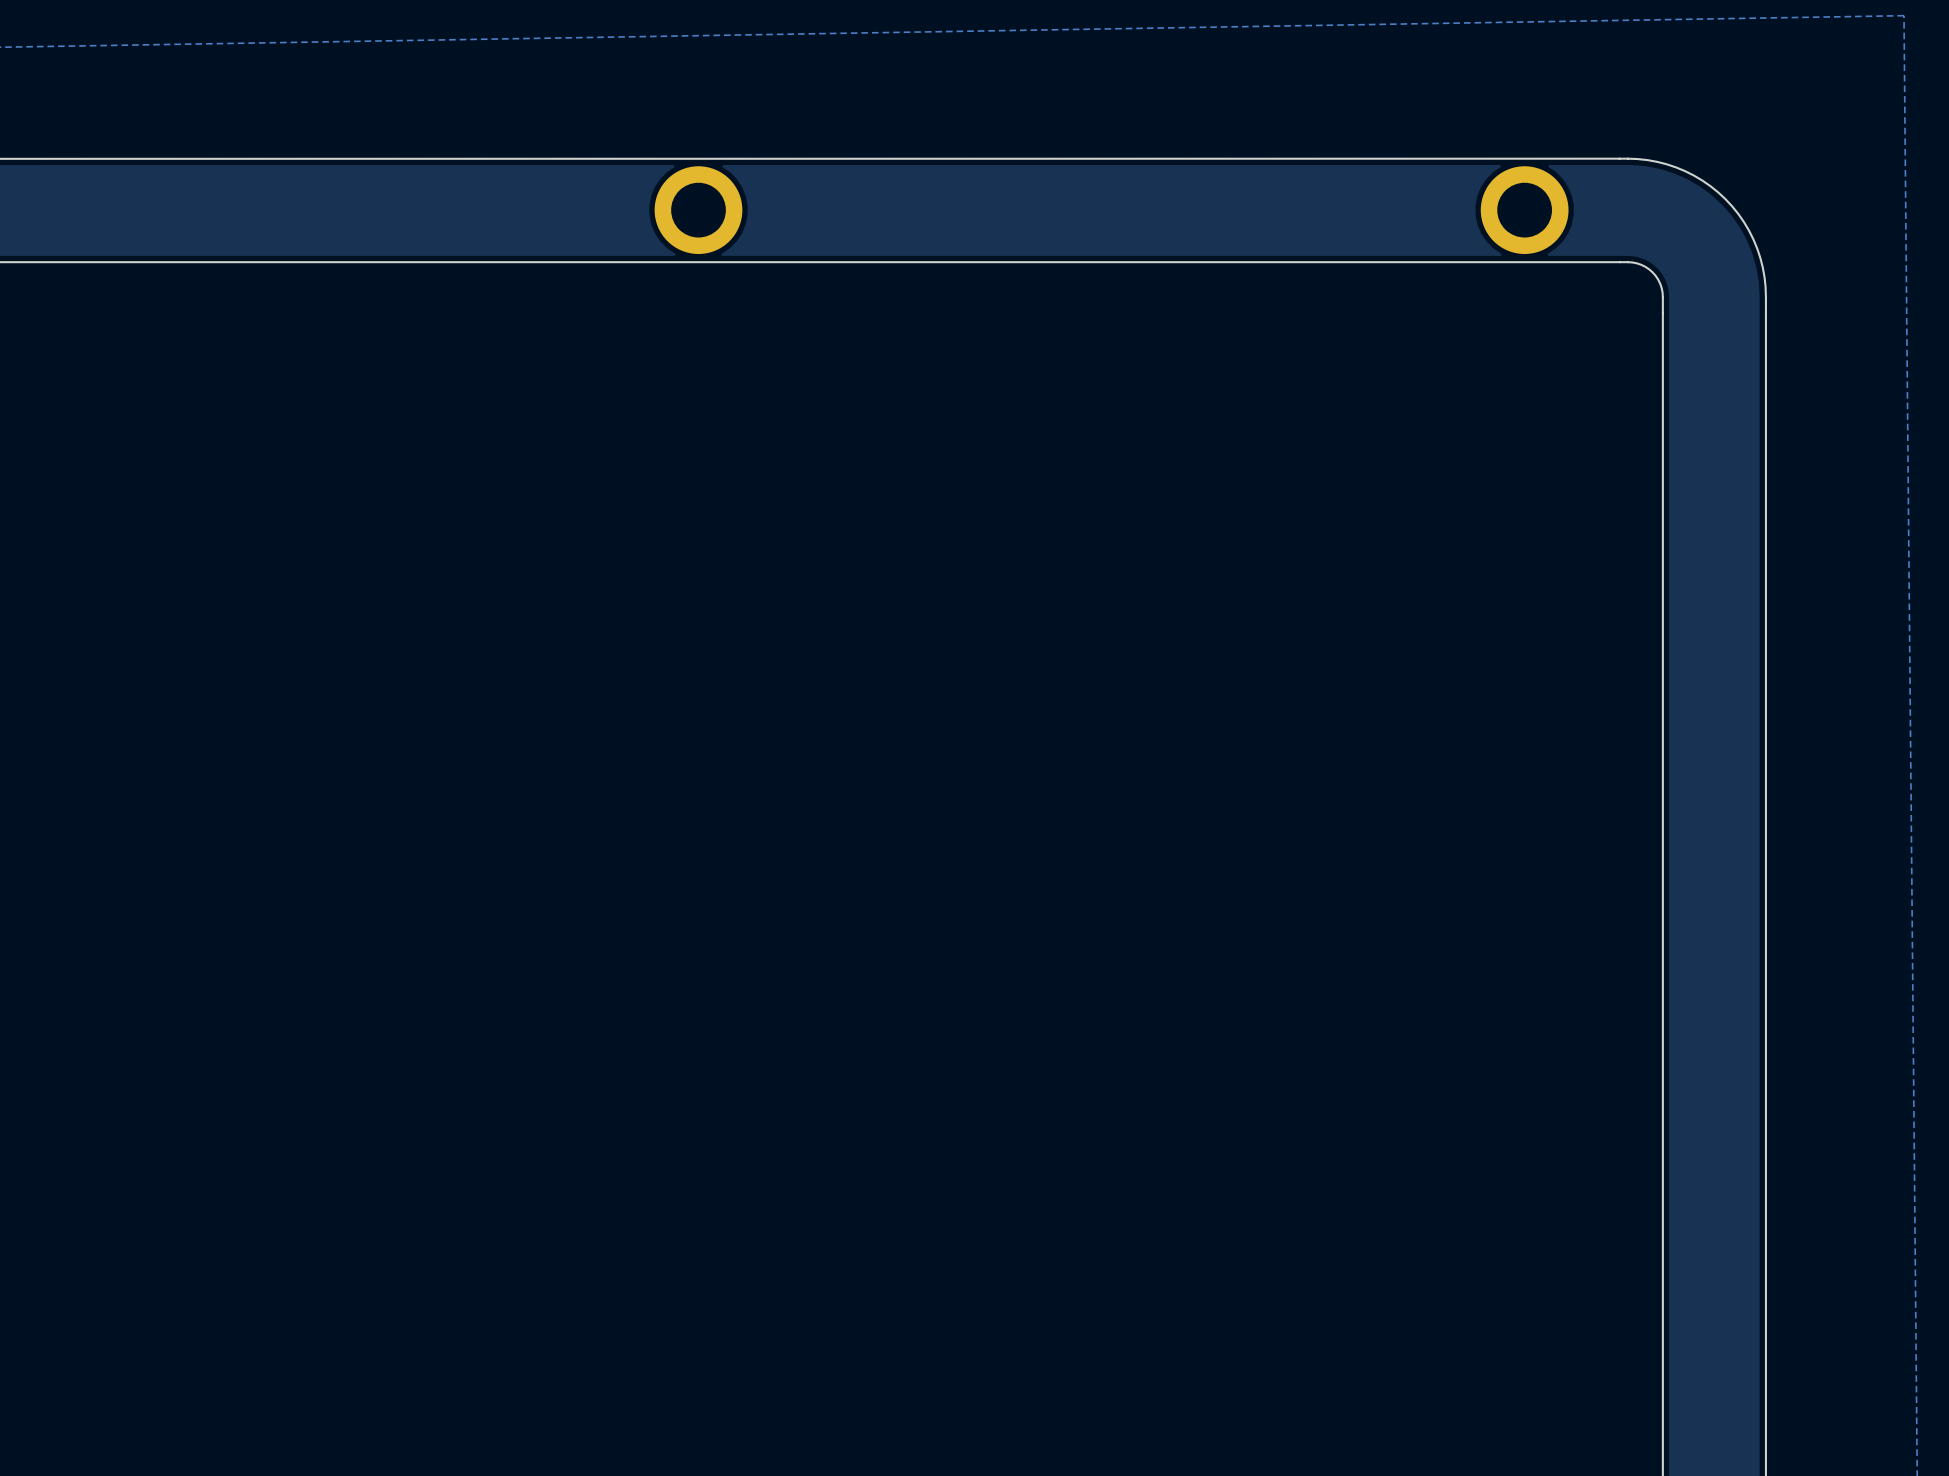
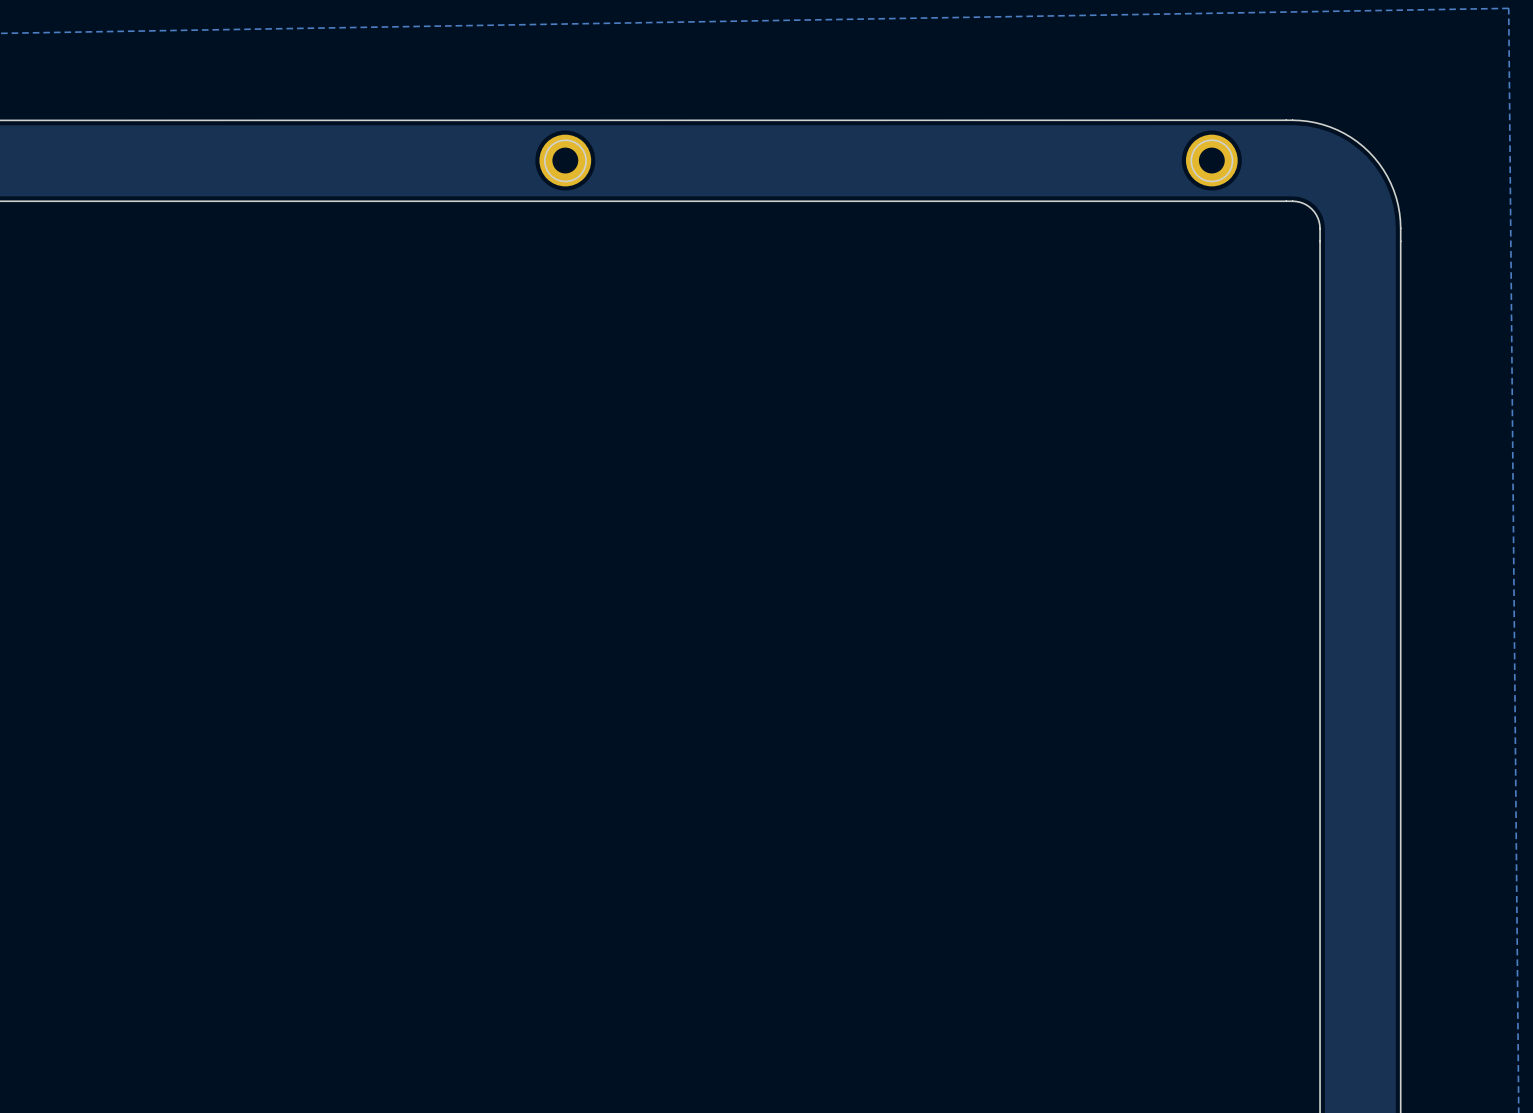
part footprint: [654, 166, 743, 255] -> [539, 134, 592, 187]
part footprint: [1480, 166, 1569, 255] -> [1185, 134, 1238, 187]
round board edge: none -> [544, 139, 587, 183]
round board edge: none -> [1190, 139, 1234, 183]

